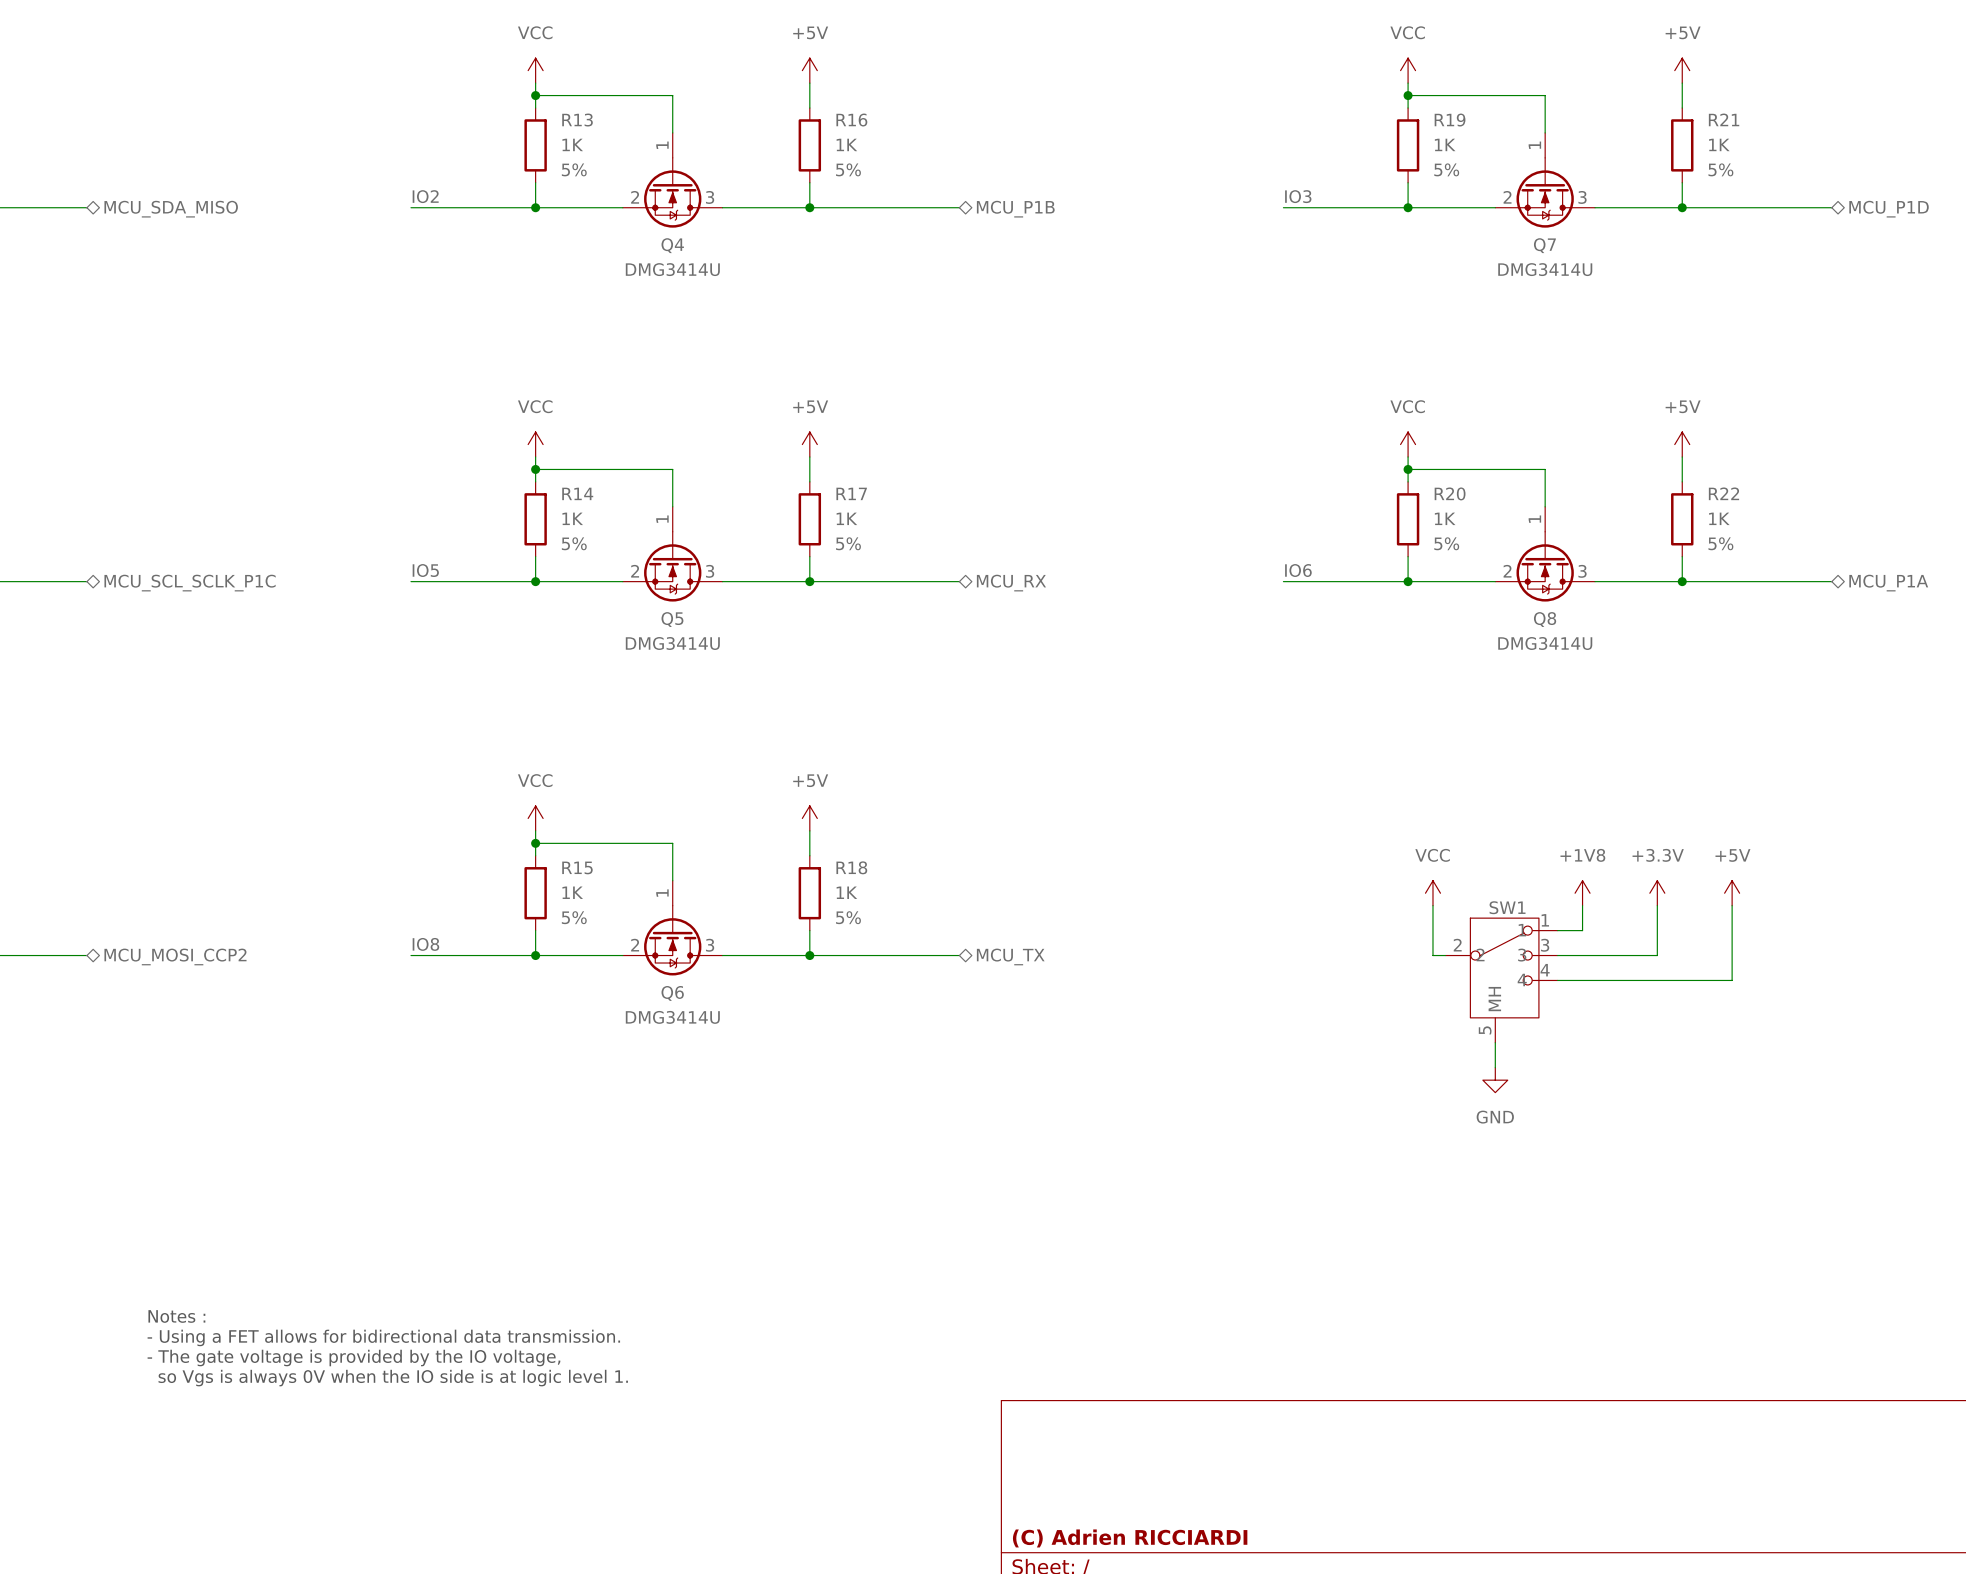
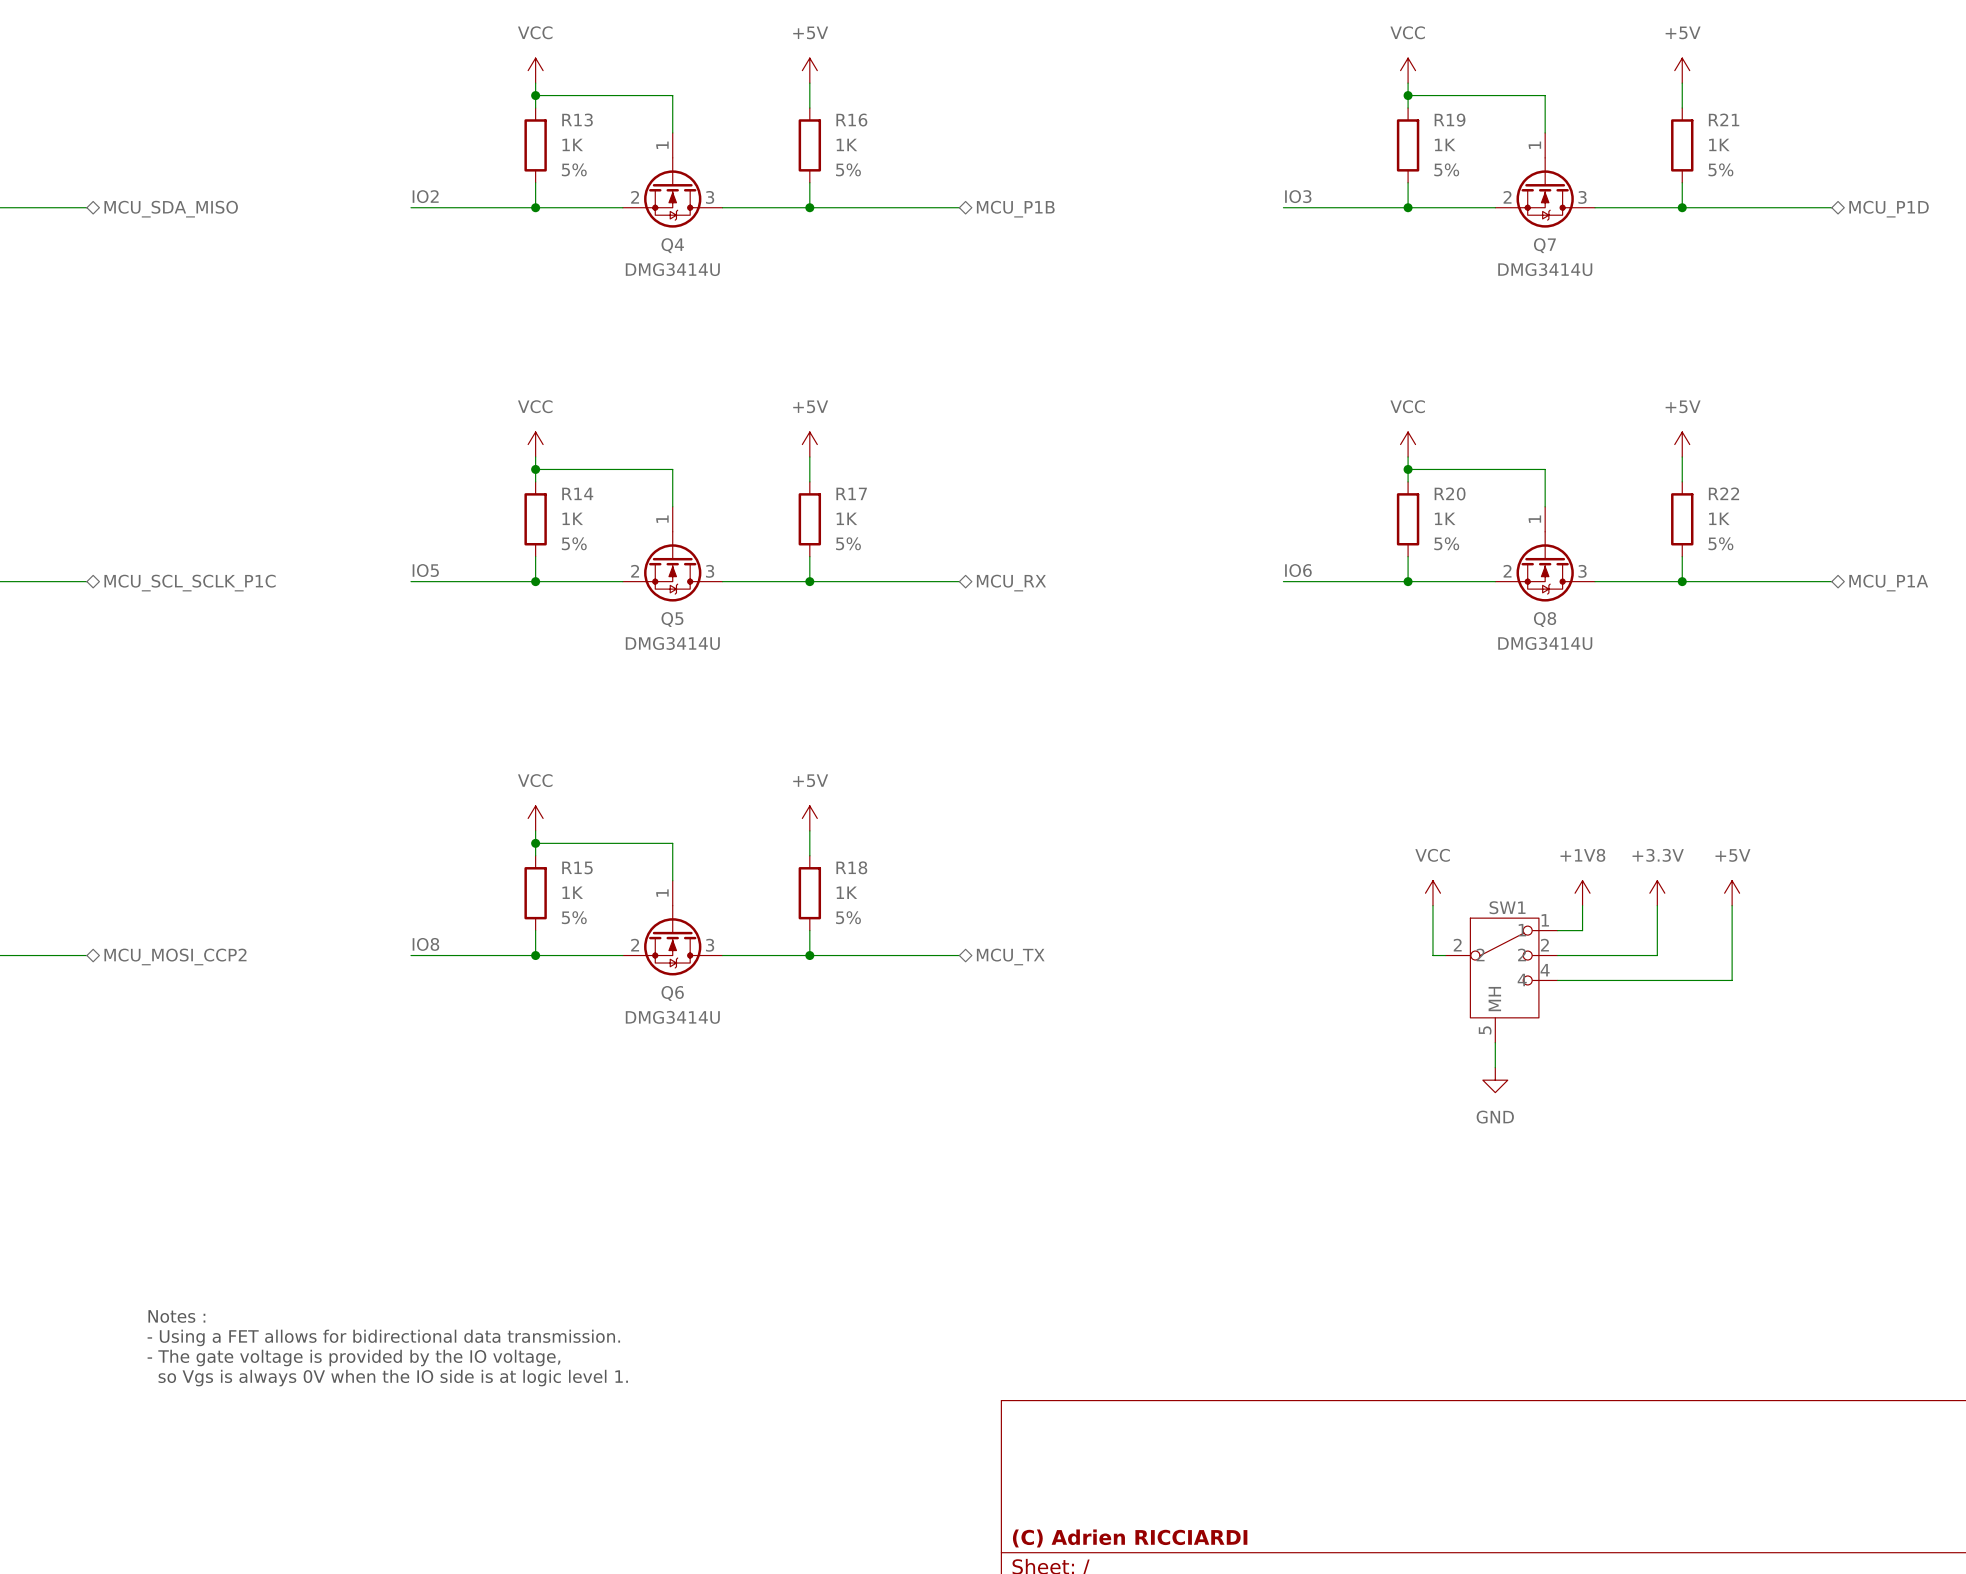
SW1 pin number: 3 (1545, 945) -> 2 (1544, 945)
SW1 pin name: 3 (1522, 955) -> 2 (1522, 954)

